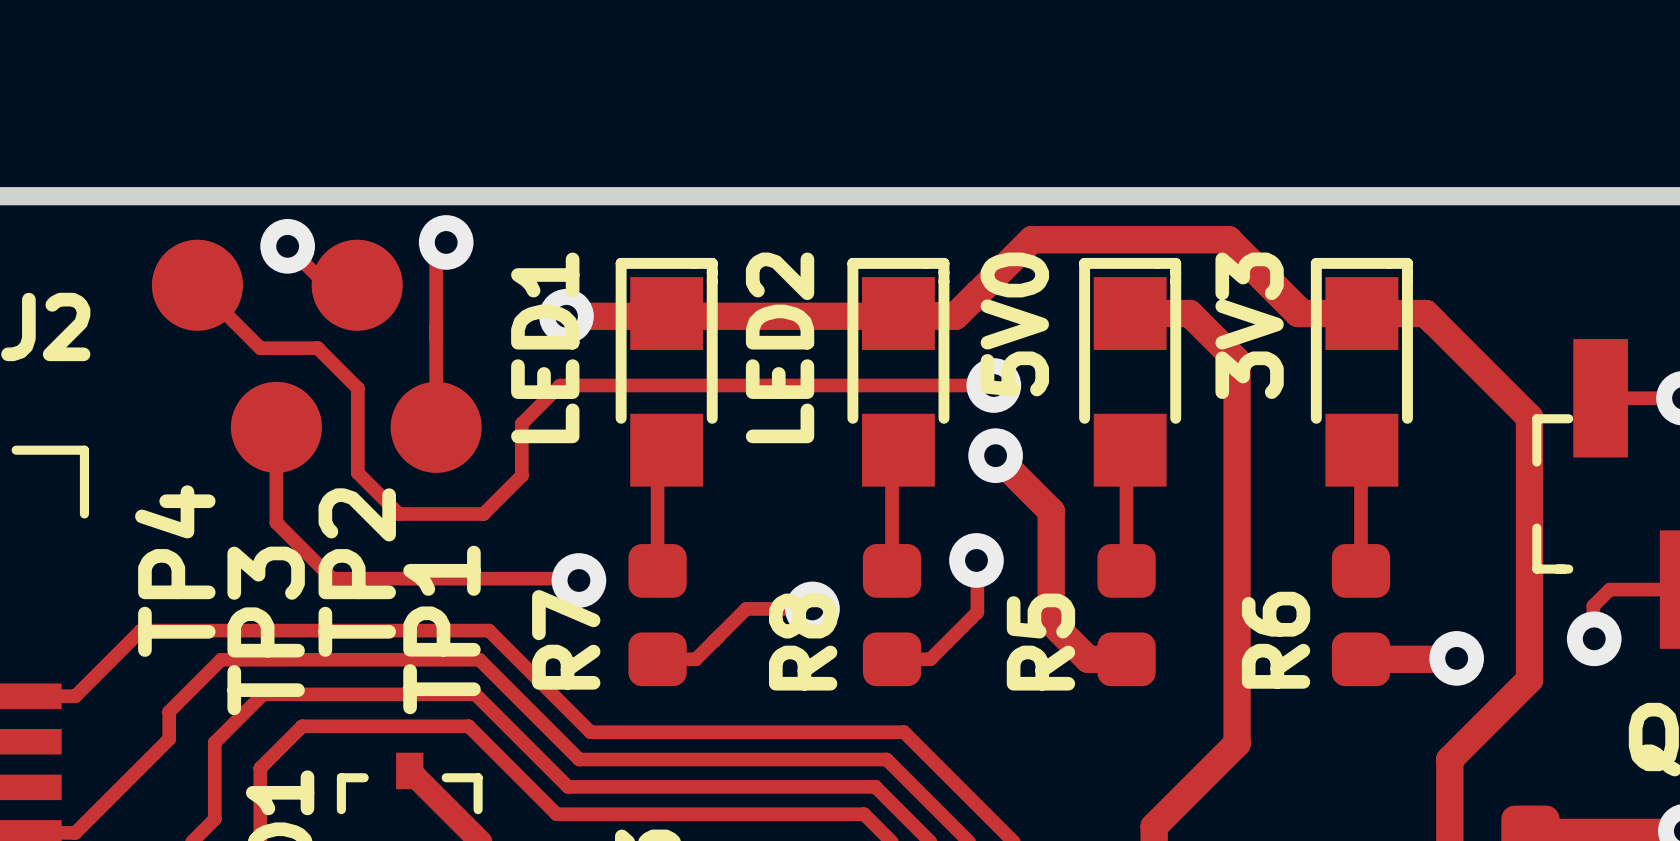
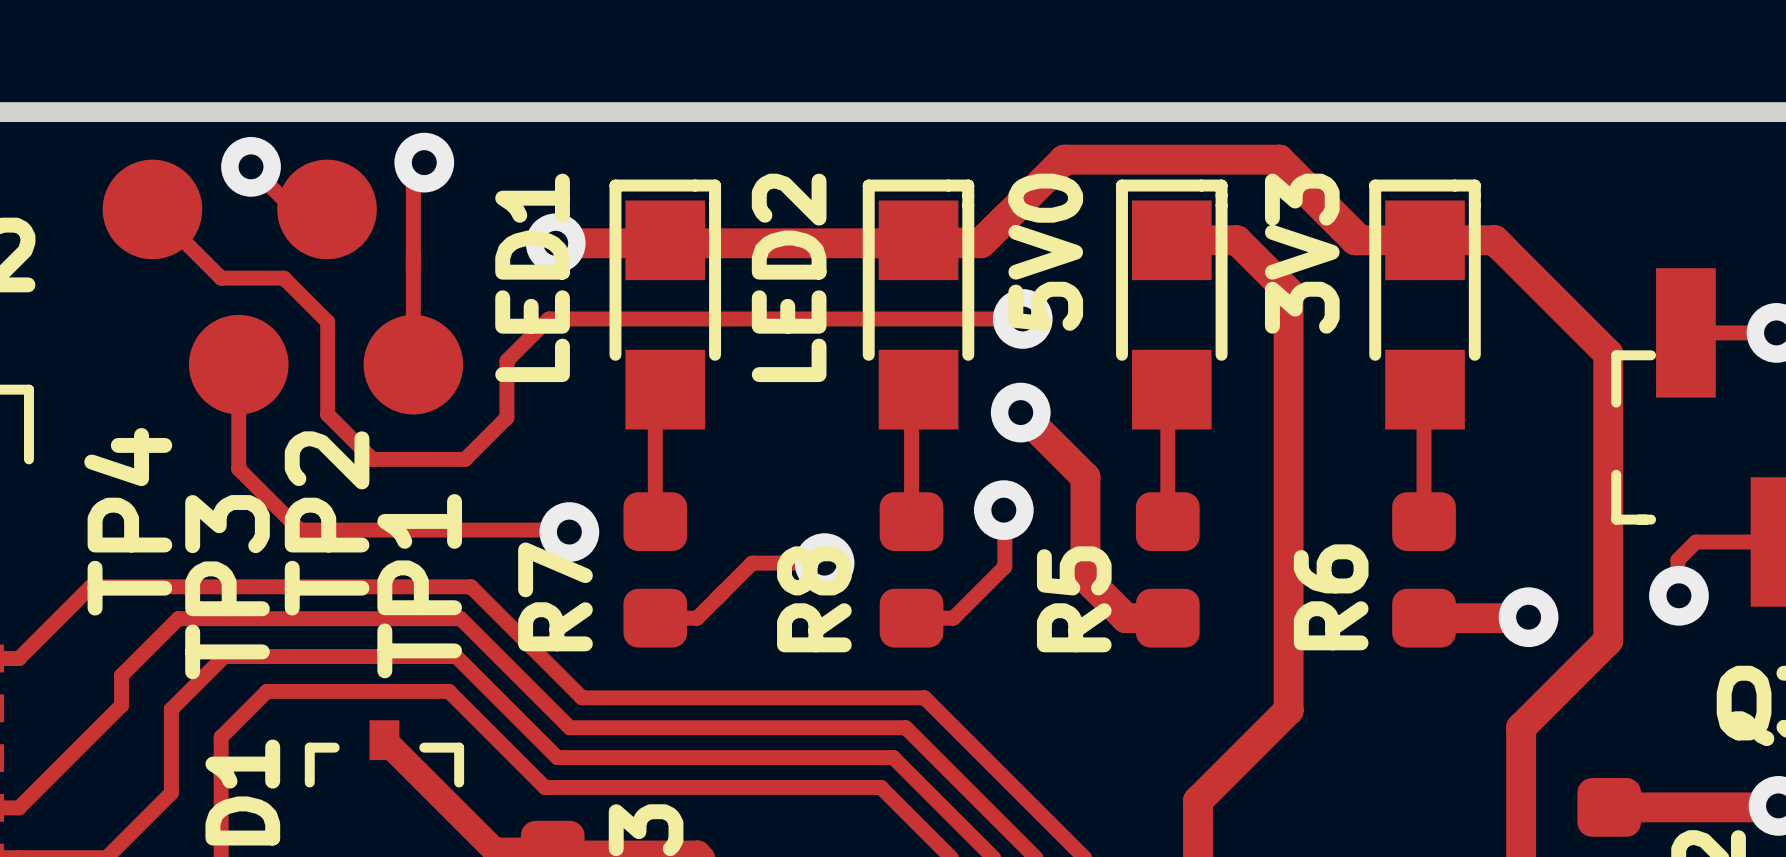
track: (995, 455) (1051, 511) (1051, 530) -> (1020, 412) (1085, 477)
via position: (995, 455) -> (1020, 412)

